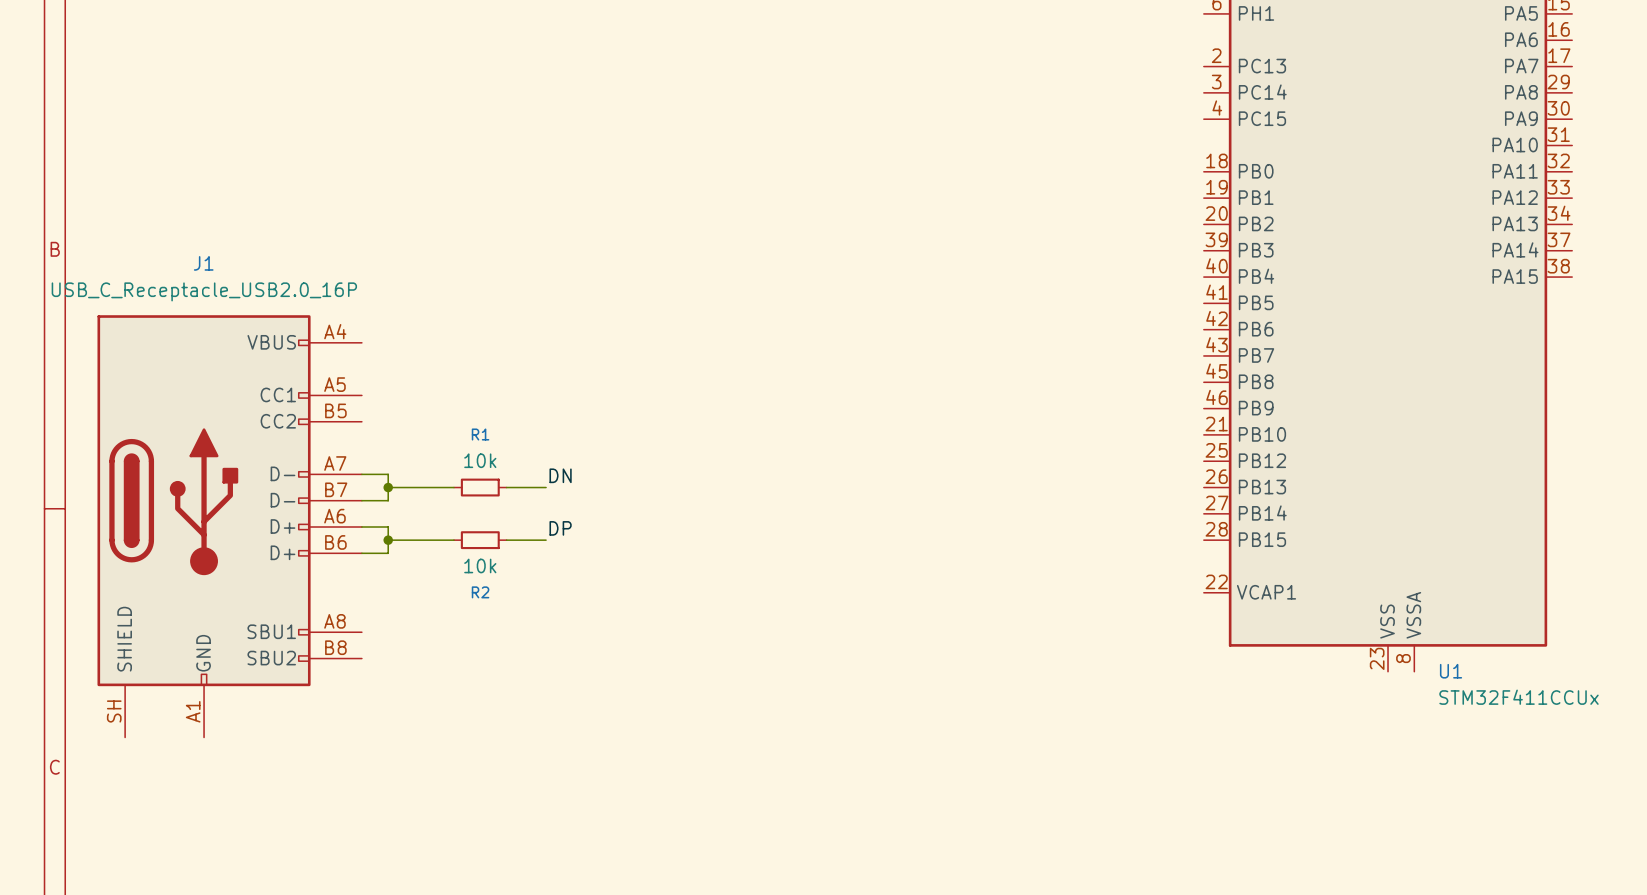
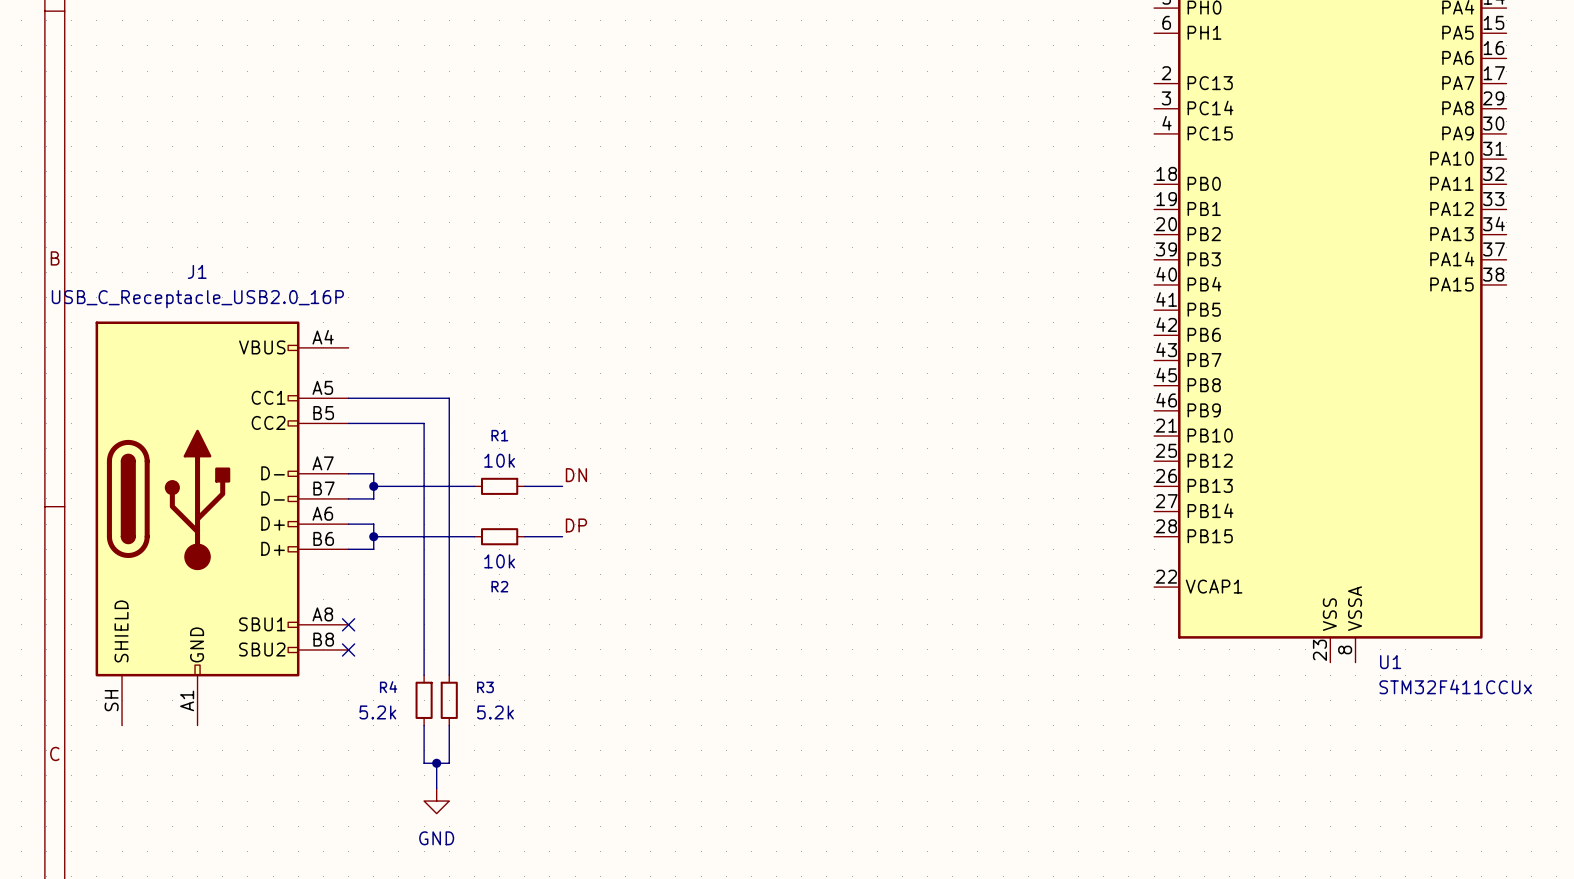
wire: none -> (348, 398) (449, 398) (449, 675)
wire: none -> (348, 423) (424, 423) (424, 675)
label position: DN (560, 475) -> DN (576, 475)
wire: none -> (436, 486) (474, 486)
R1 position: (480, 487) -> (499, 486)
wire: (506, 487) (546, 487) -> (562, 486) (524, 486)
label position: DP (560, 528) -> DP (576, 525)
wire: none -> (436, 536) (474, 536)
R2 position: (480, 540) -> (499, 536)
wire: (506, 540) (546, 540) -> (562, 536) (524, 536)
no-connect mark: none -> (348, 624)
no-connect mark: none -> (348, 649)
R4: none -> 5.2k (424, 700)
R3: none -> 5.2k (449, 700)
wire: none -> (424, 725) (424, 763) (449, 763) (449, 725)
wire: none -> (436, 763) (436, 788)
junction: none -> (436, 763)
power symbol: none -> GND (436, 801)

